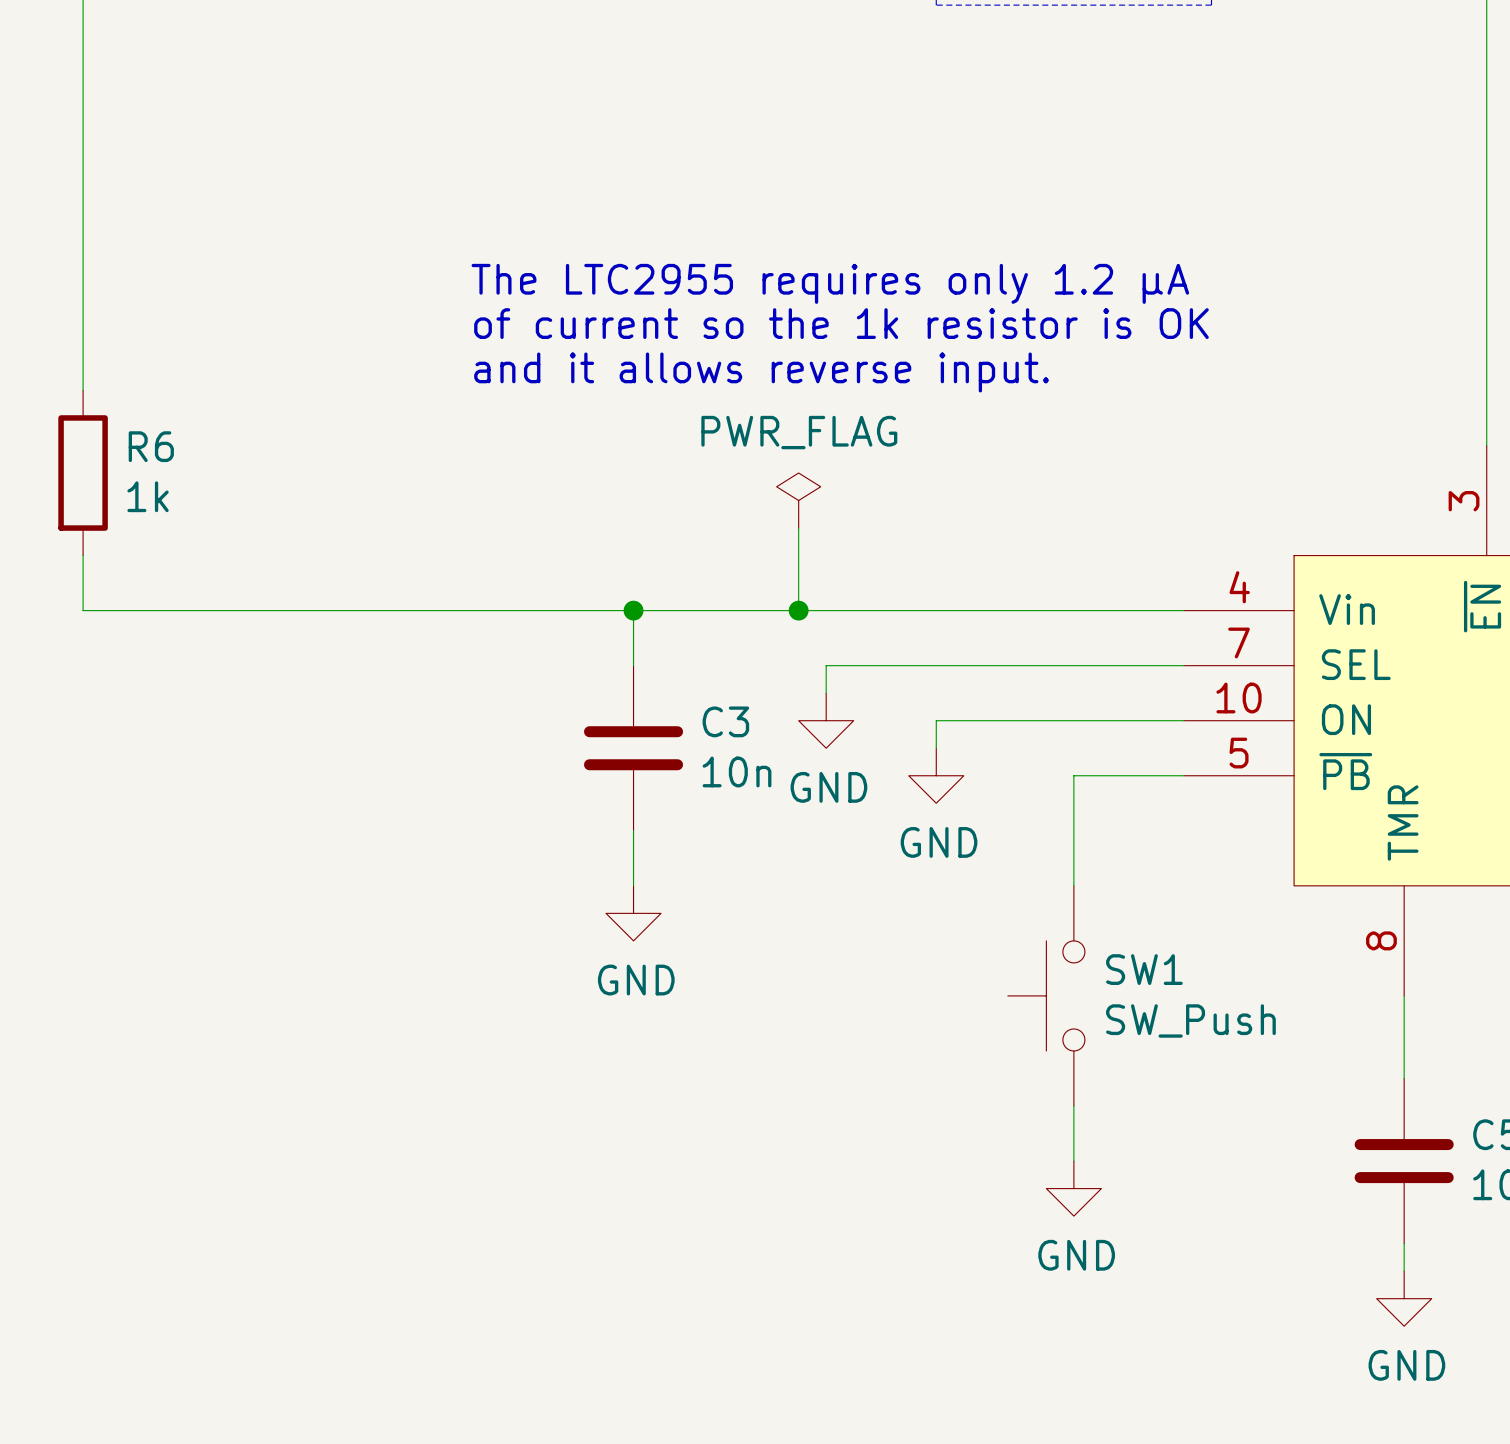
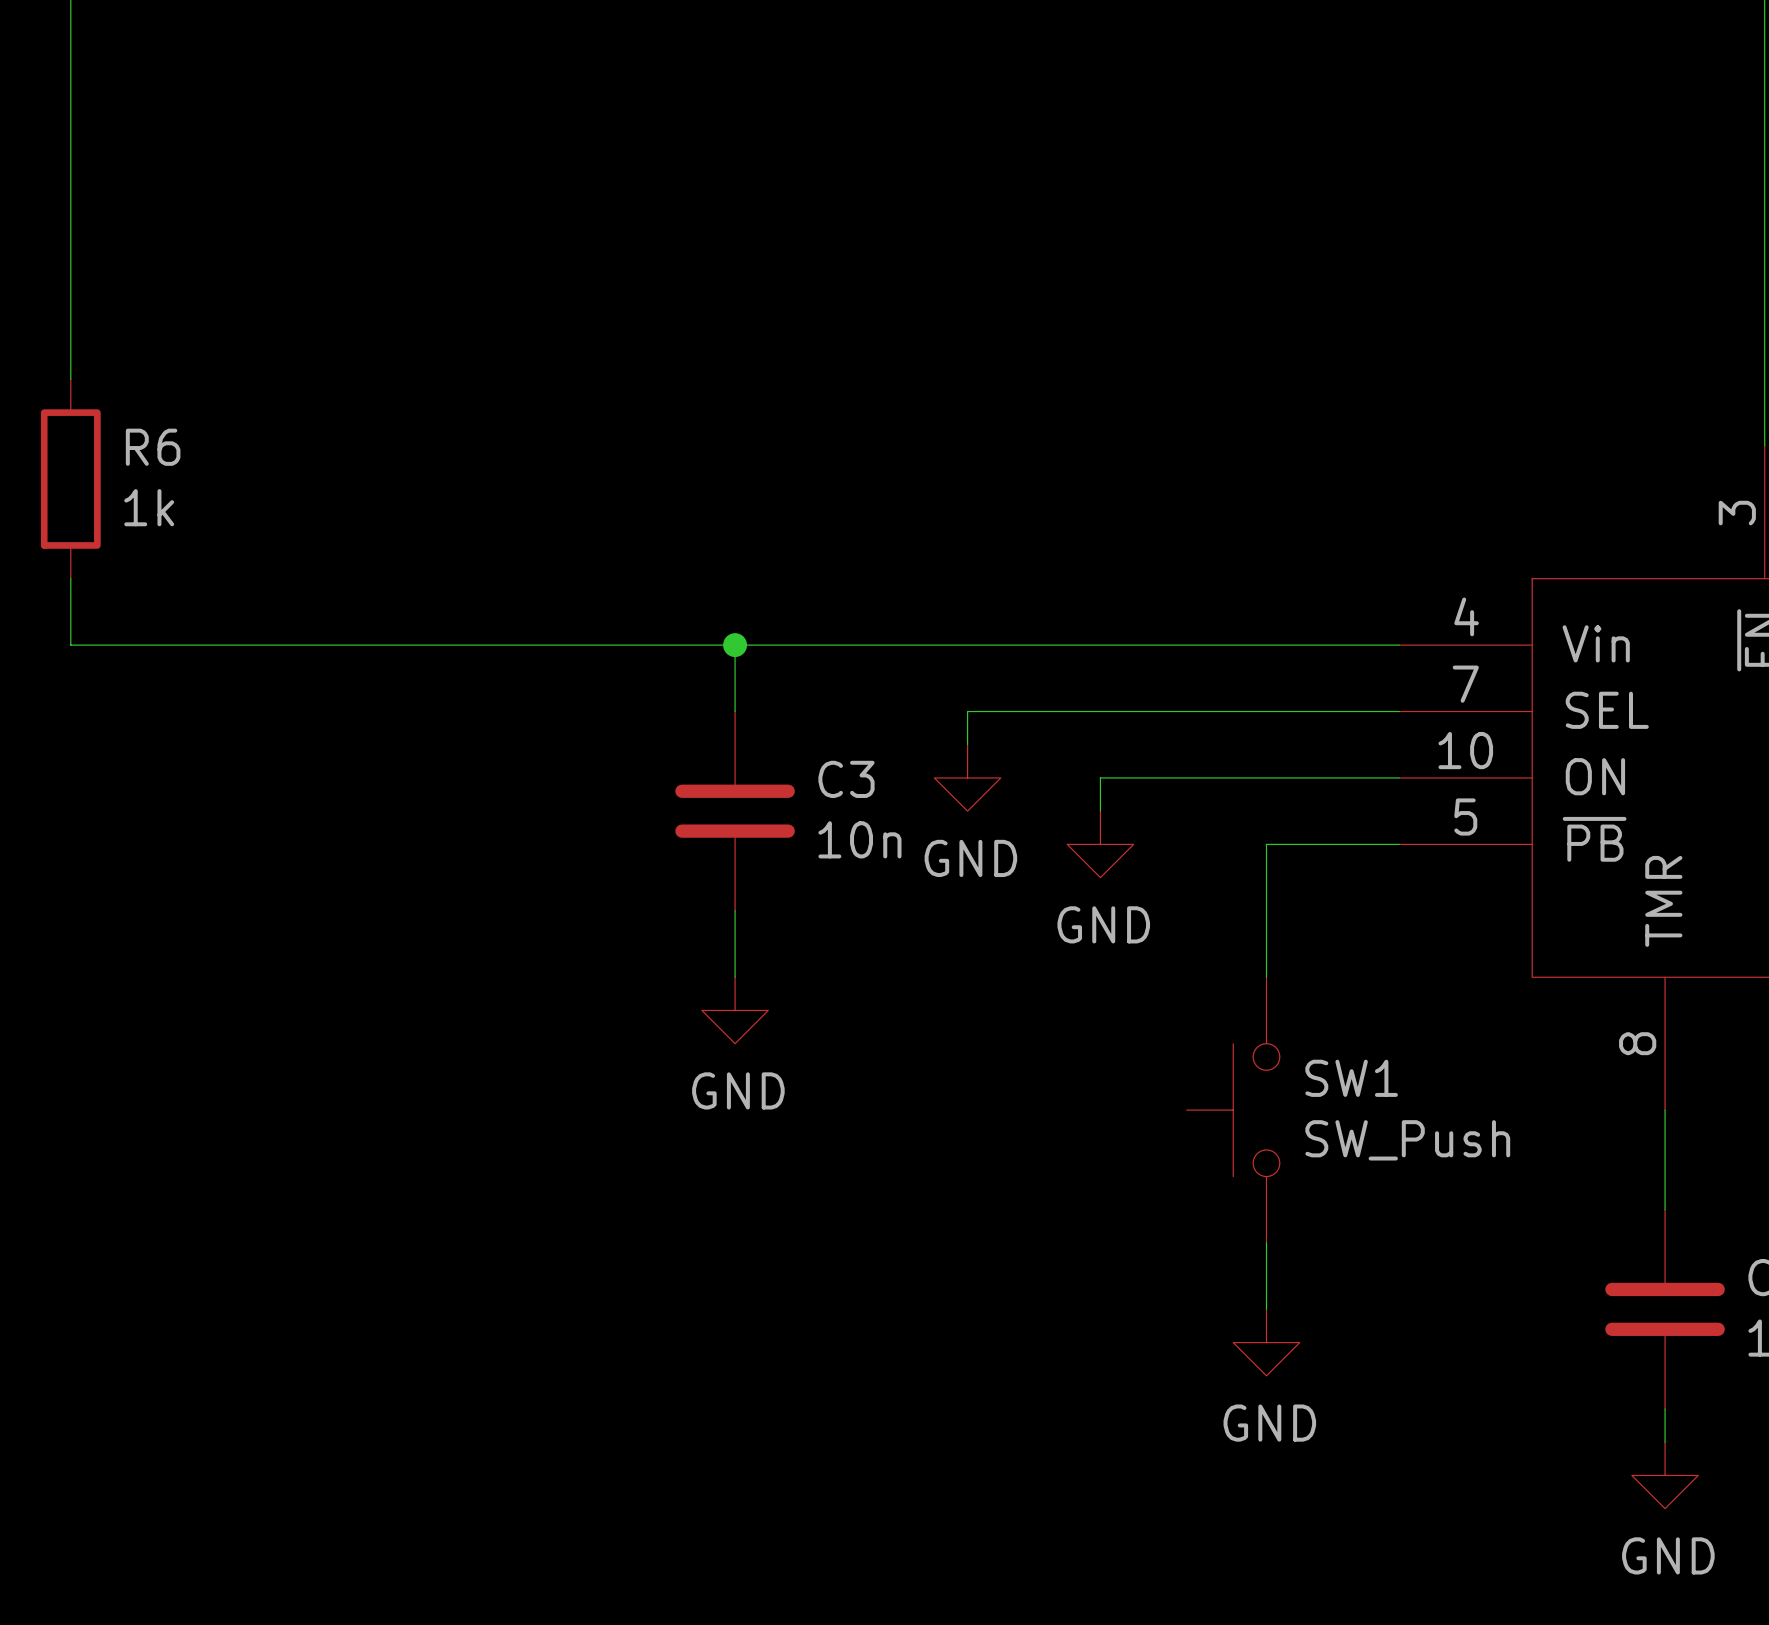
text: The LTC2955 requires only 1.2 µA (830, 283) -> none
text: of current so the 1k resistor is OK (841, 323) -> none
text: and it allows reverse input. (761, 372) -> none
power symbol: PWR_FLAG (798, 500) -> none
wire: (798, 528) (798, 610) -> none
junction: (798, 610) -> none

